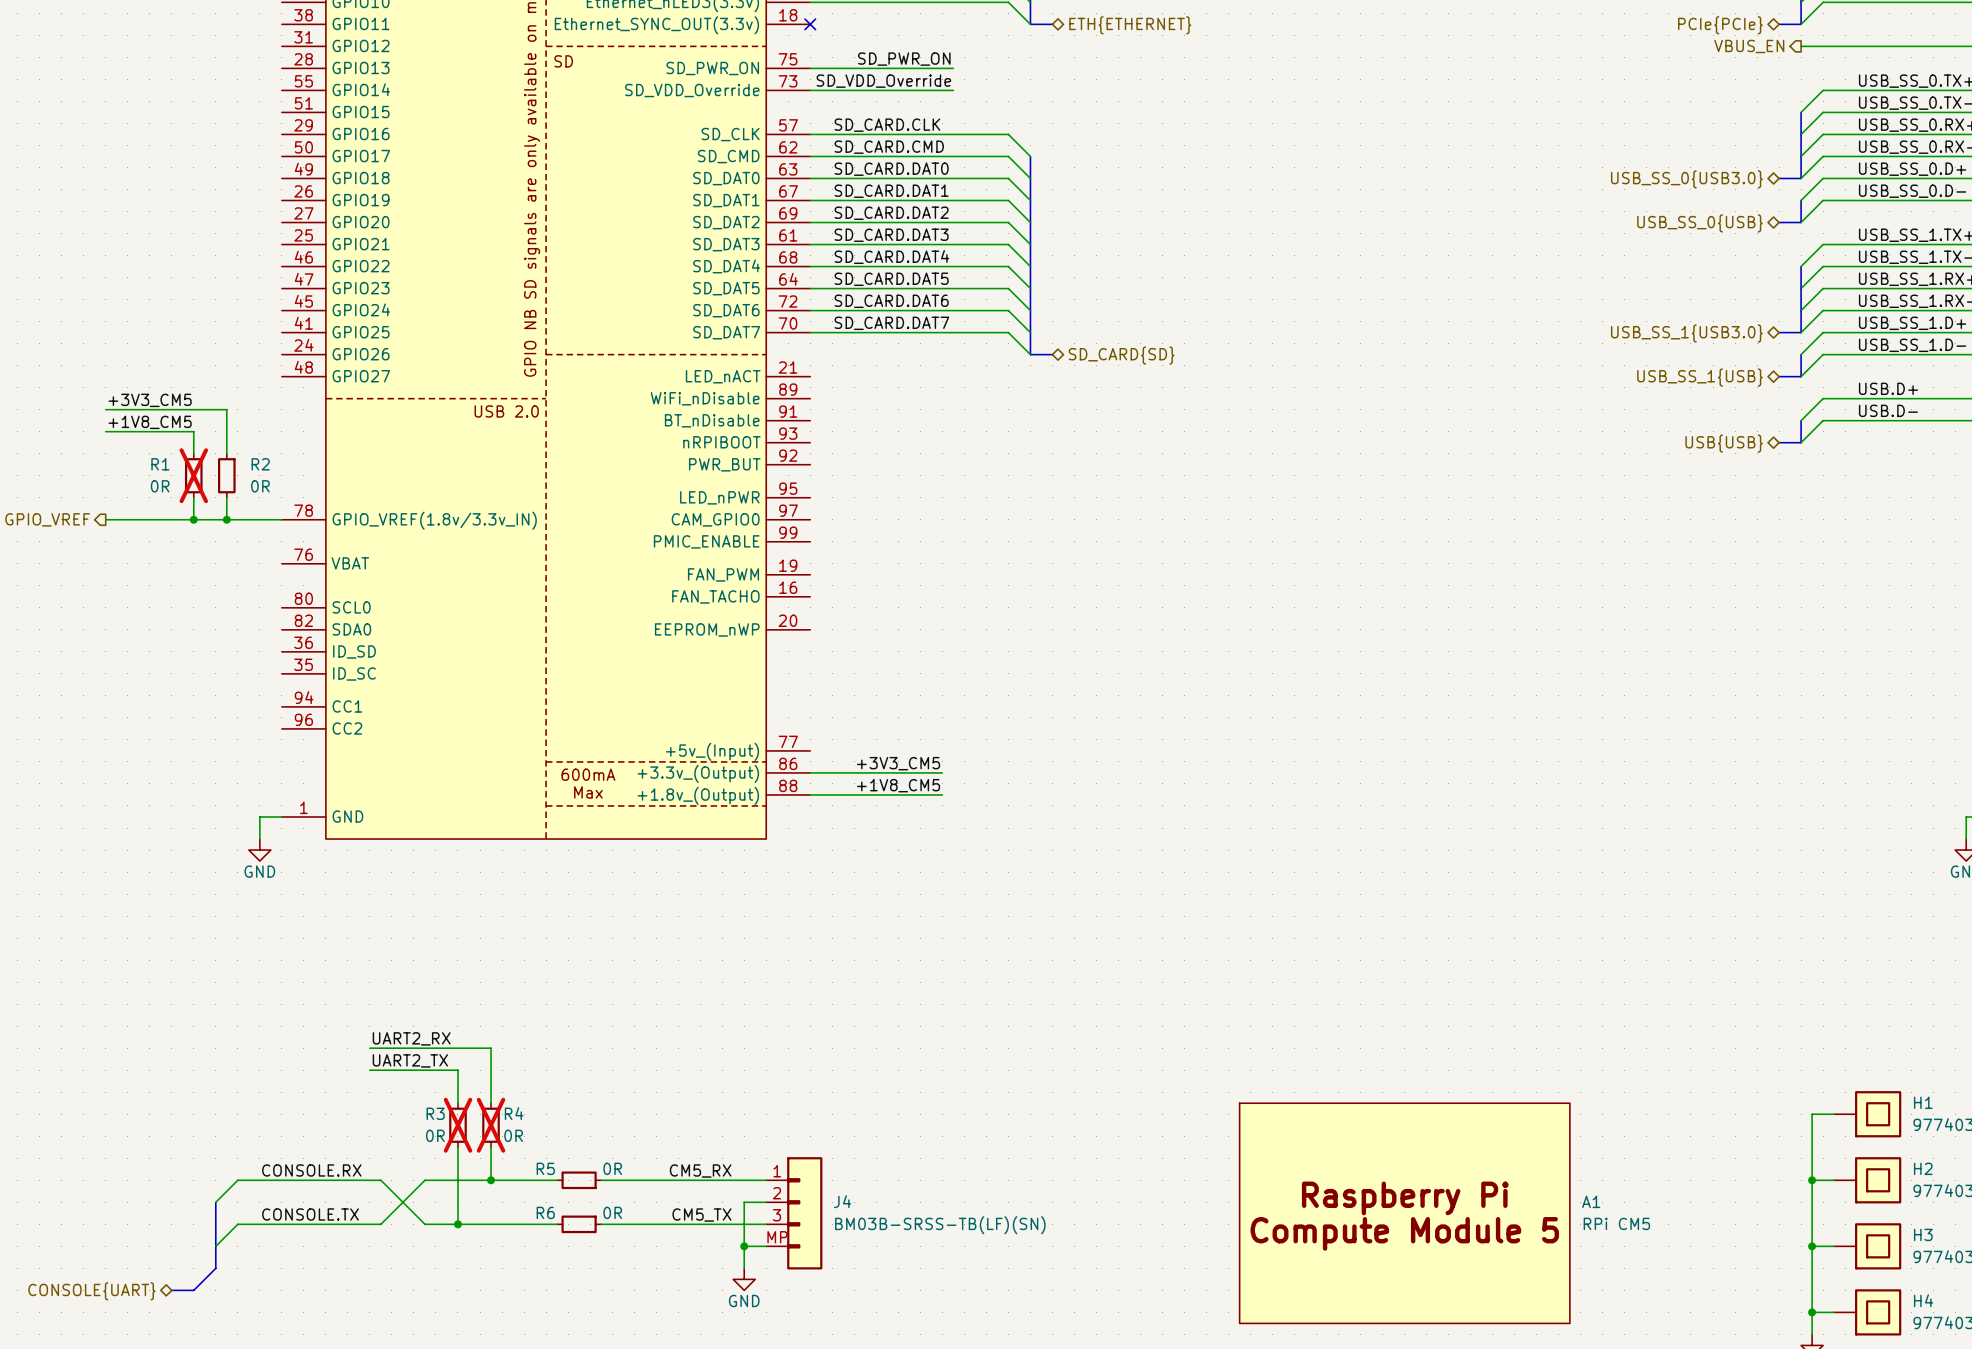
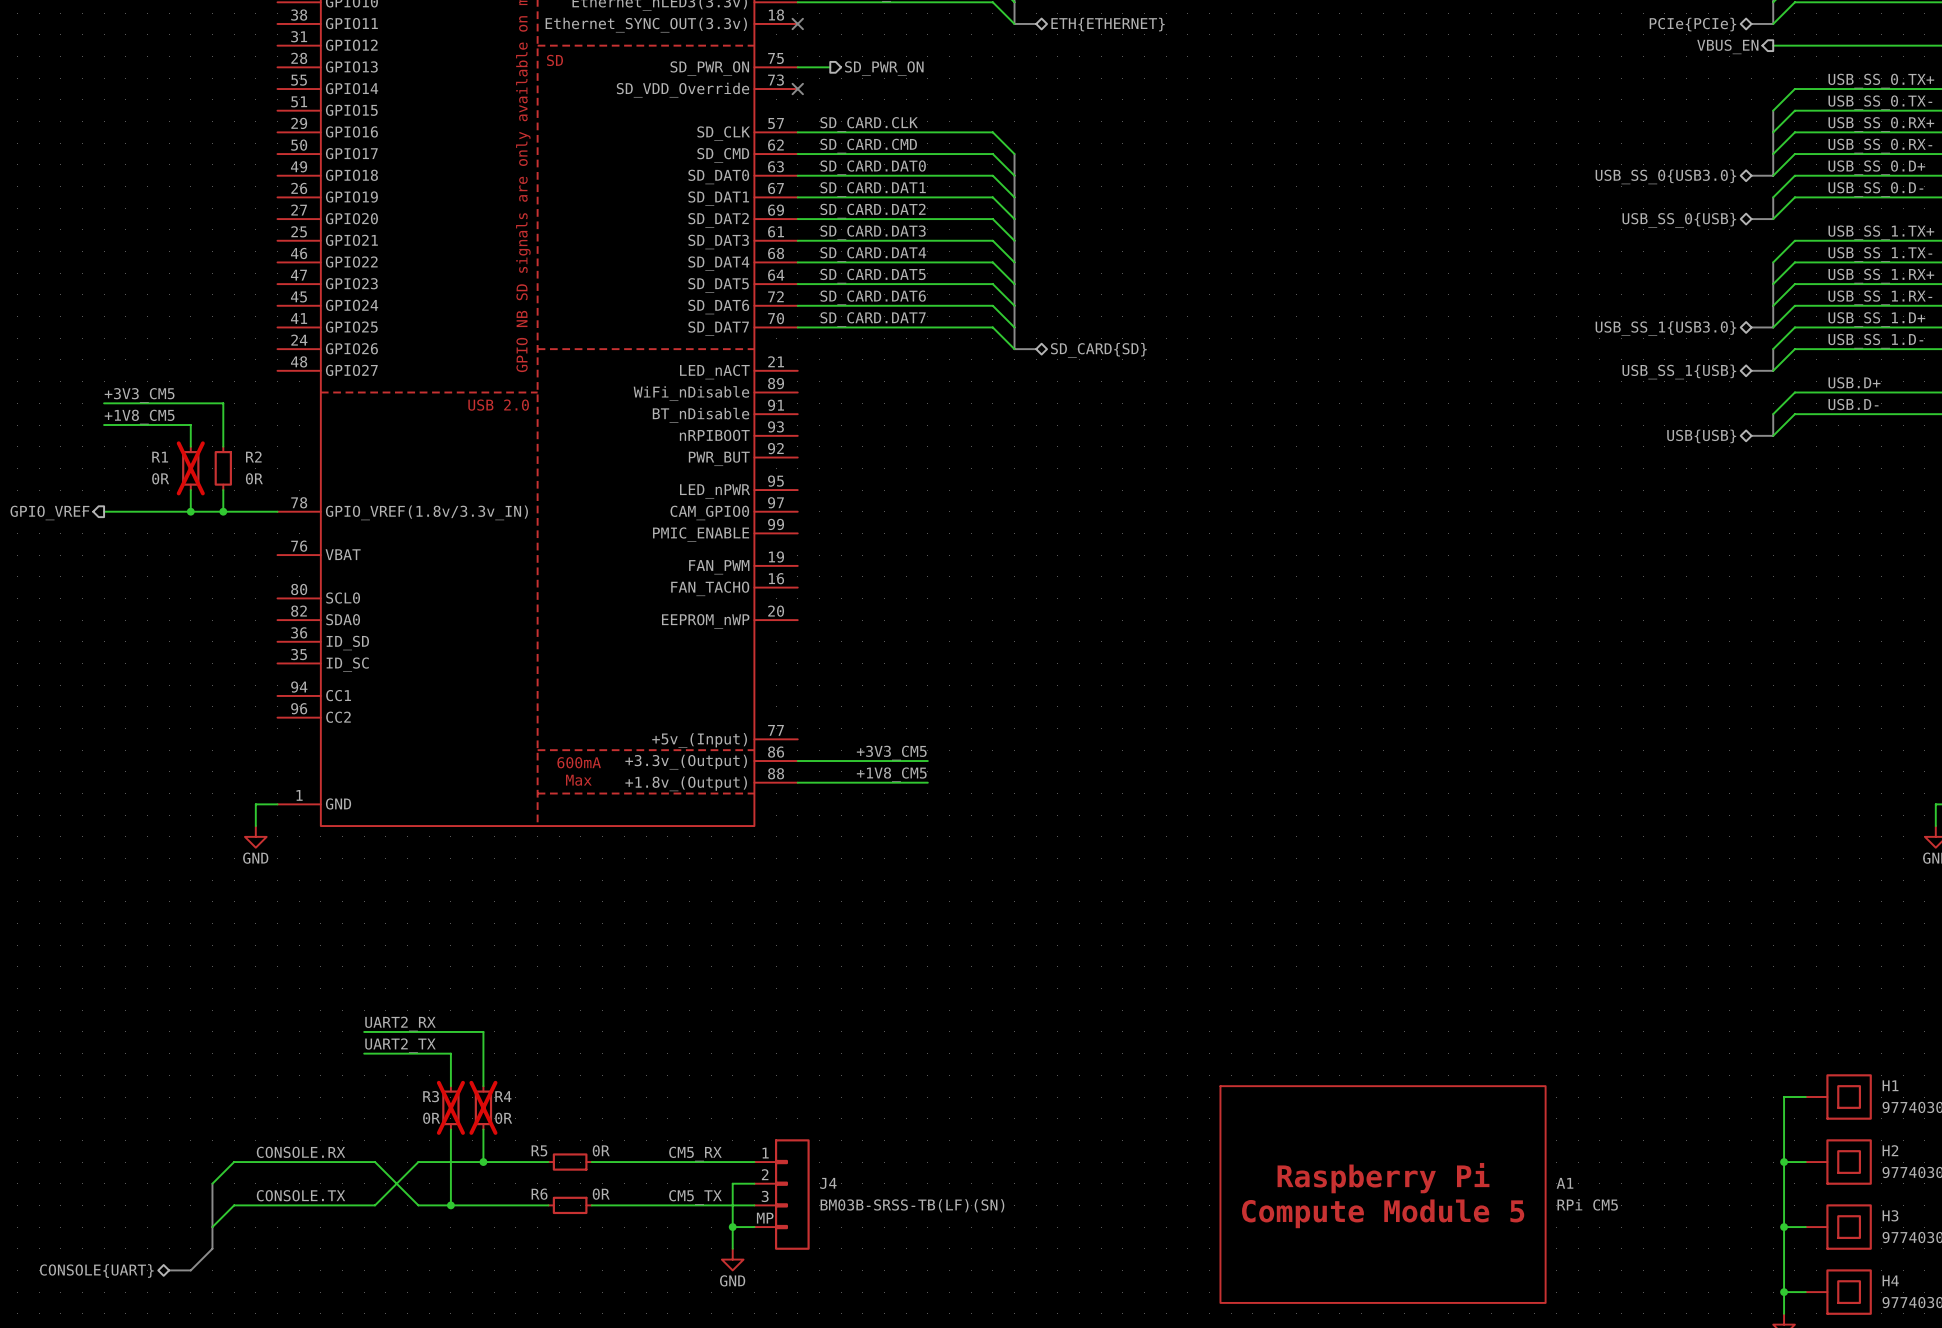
label: SD_PWR_ON (904, 59) -> none
wire: (843, 68) (953, 68) -> none
hierarchical label: none -> SD_PWR_ON (884, 68)
label: SD_VDD_Override (883, 81) -> none
wire: (810, 90) (953, 90) -> none
no-connect mark: none -> (797, 89)

